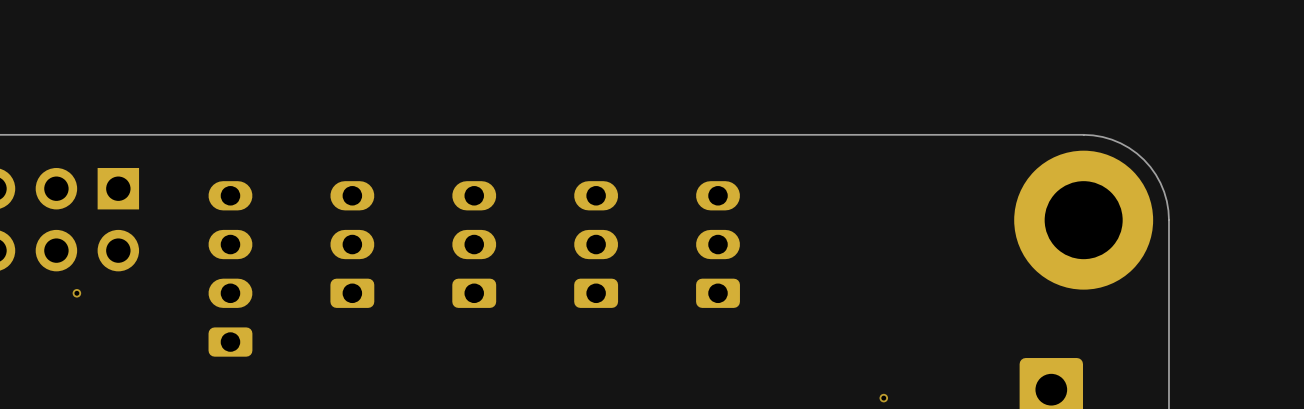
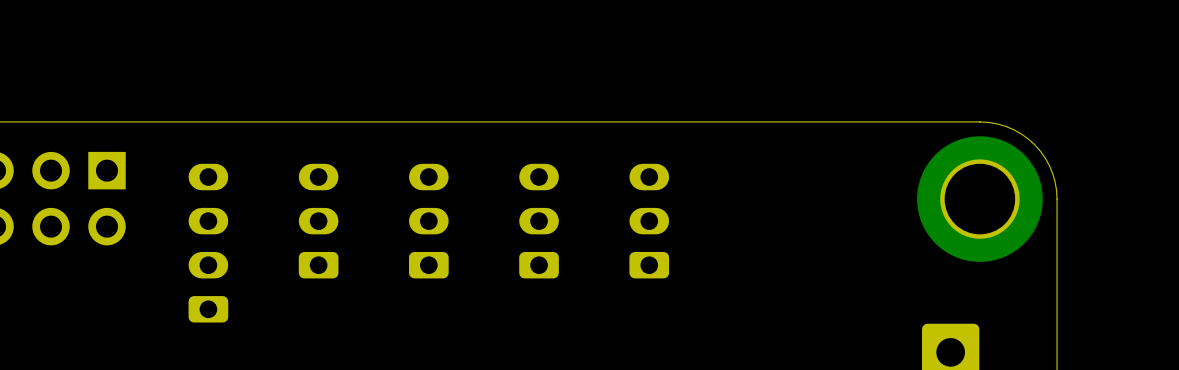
via: (76, 293) -> none
via: (883, 398) -> none

